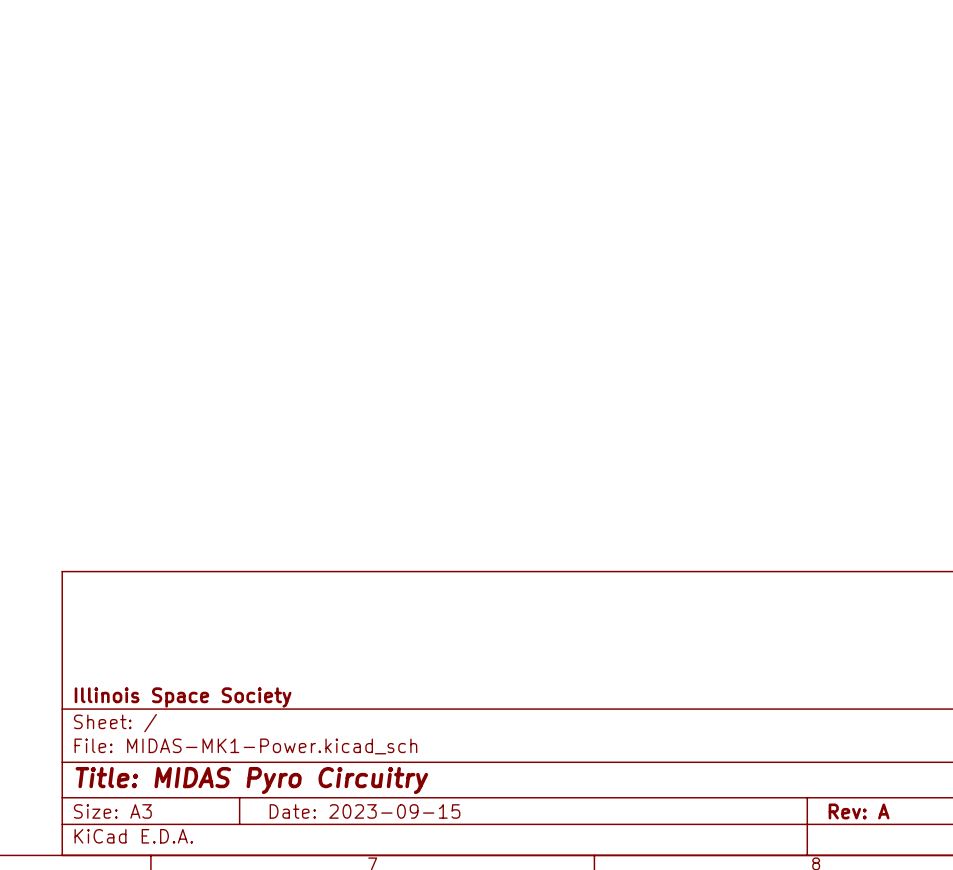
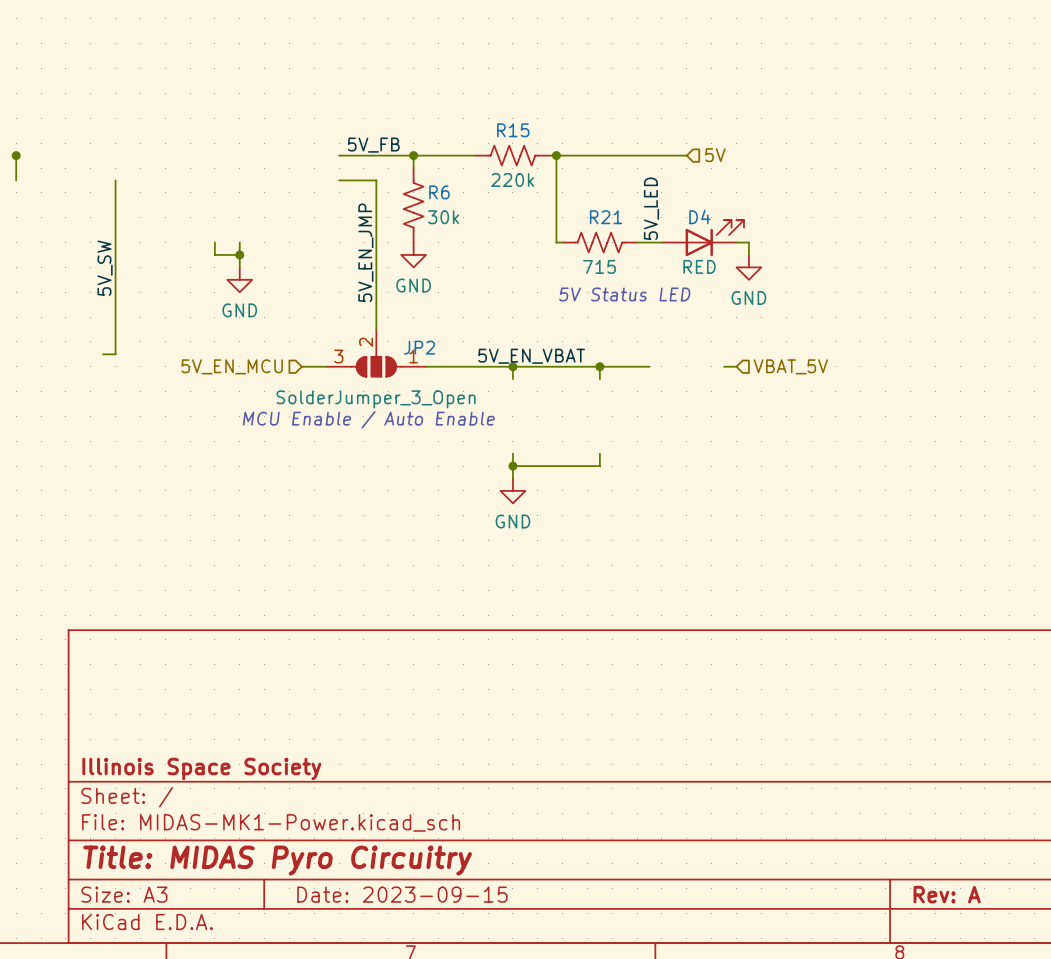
label: none -> 5V_FB (373, 145)
hierarchical label: none -> 5V (715, 155)
wire: none -> (16, 155) (16, 180)
junction: none -> (16, 155)
wire: none -> (339, 155) (475, 155)
wire: none -> (413, 155) (413, 168)
junction: none -> (413, 155)
R15: none -> 220k (512, 155)
wire: none -> (550, 155) (686, 155)
wire: none -> (556, 155) (556, 242) (562, 242)
junction: none -> (556, 155)
wire: none -> (115, 180) (115, 354) (103, 354)
wire: none -> (339, 180) (376, 180) (376, 329)
R6: none -> 30k (413, 205)
label: none -> 5V_LED (651, 208)
D4: none -> RED (702, 238)
wire: none -> (214, 242) (214, 254) (239, 254)
wire: none -> (239, 242) (239, 267)
R21: none -> 715 (599, 242)
wire: none -> (637, 242) (661, 242)
wire: none -> (736, 242) (748, 242) (748, 254)
label: none -> 5V_EN_JMP (365, 252)
junction: none -> (239, 254)
power symbol: none -> GND (413, 254)
power symbol: none -> GND (748, 267)
label: none -> 5V_SW (105, 268)
power symbol: none -> GND (239, 279)
text: none -> 5V Status LED (624, 294)
JP2: none -> SolderJumper_3_Open (376, 353)
label: none -> 5V_EN_VBAT (531, 356)
hierarchical label: none -> 5V_EN_MCU (232, 366)
wire: none -> (301, 366) (326, 366)
wire: none -> (426, 366) (649, 366)
wire: none -> (512, 366) (512, 379)
junction: none -> (512, 366)
wire: none -> (599, 366) (599, 379)
junction: none -> (599, 366)
wire: none -> (724, 366) (736, 366)
hierarchical label: none -> VBAT_5V (790, 366)
text: none -> MCU Enable / Auto Enable (368, 419)
wire: none -> (512, 453) (512, 478)
wire: none -> (599, 453) (599, 466) (512, 466)
junction: none -> (512, 466)
power symbol: none -> GND (512, 490)

